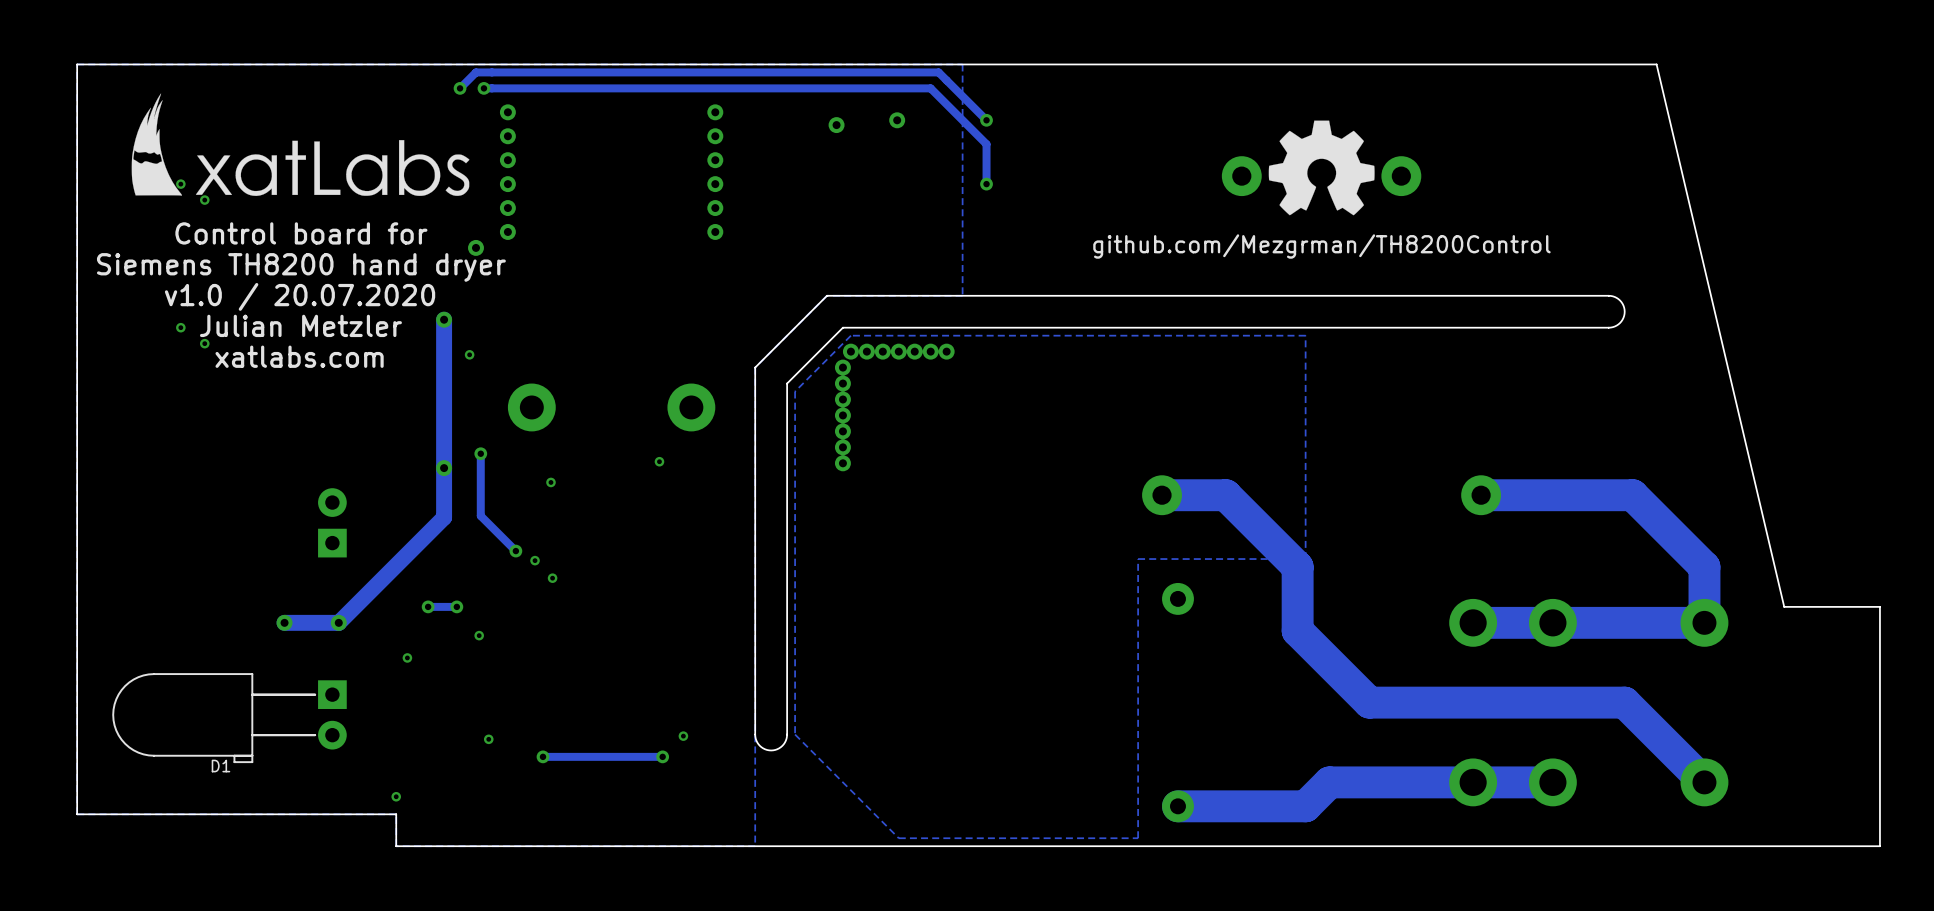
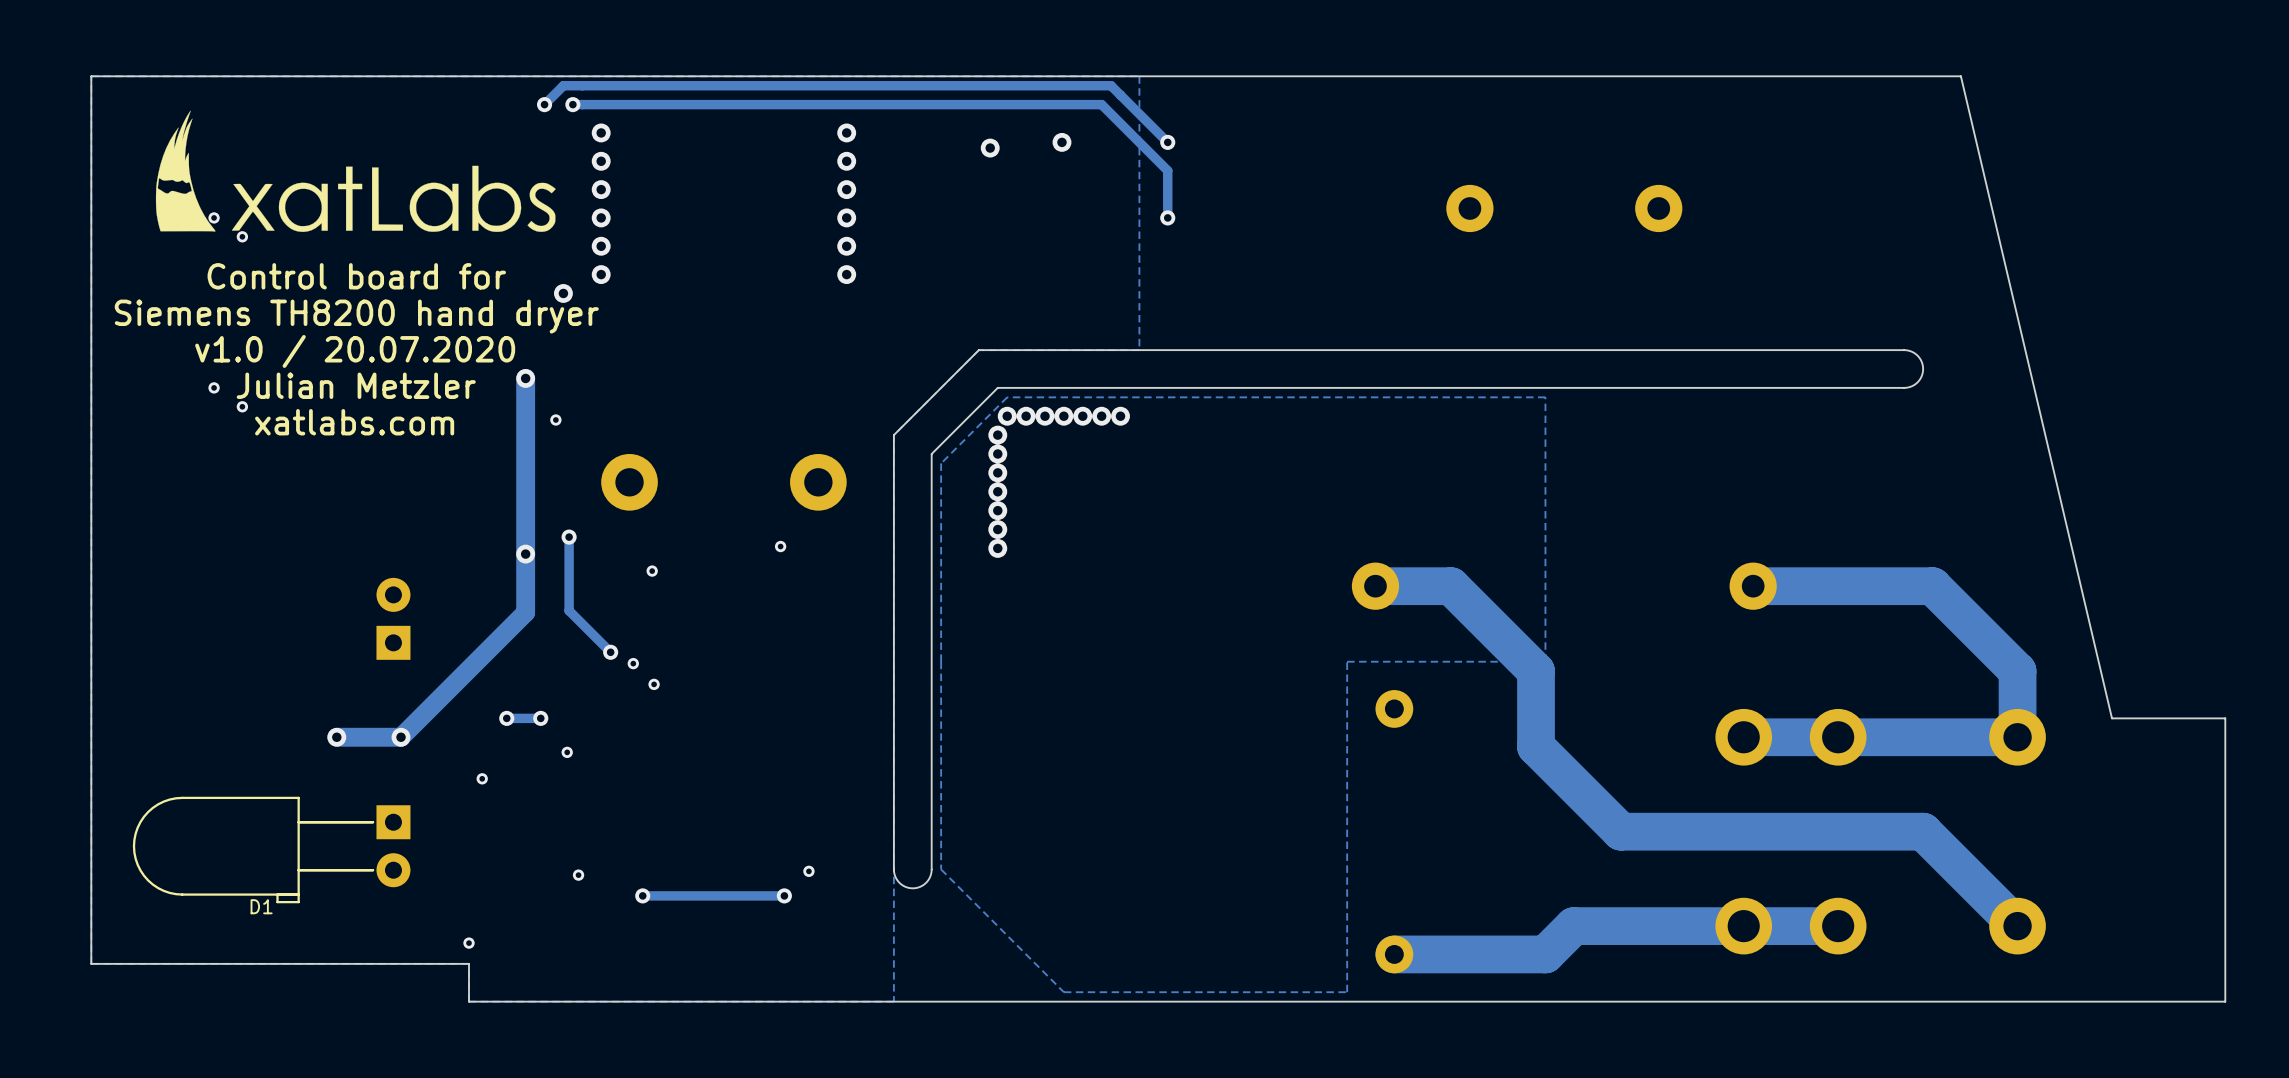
drawing: [1268, 120, 1375, 216] -> none
text: github.com/Mezgrman/TH8200Control (1321, 246) -> none

